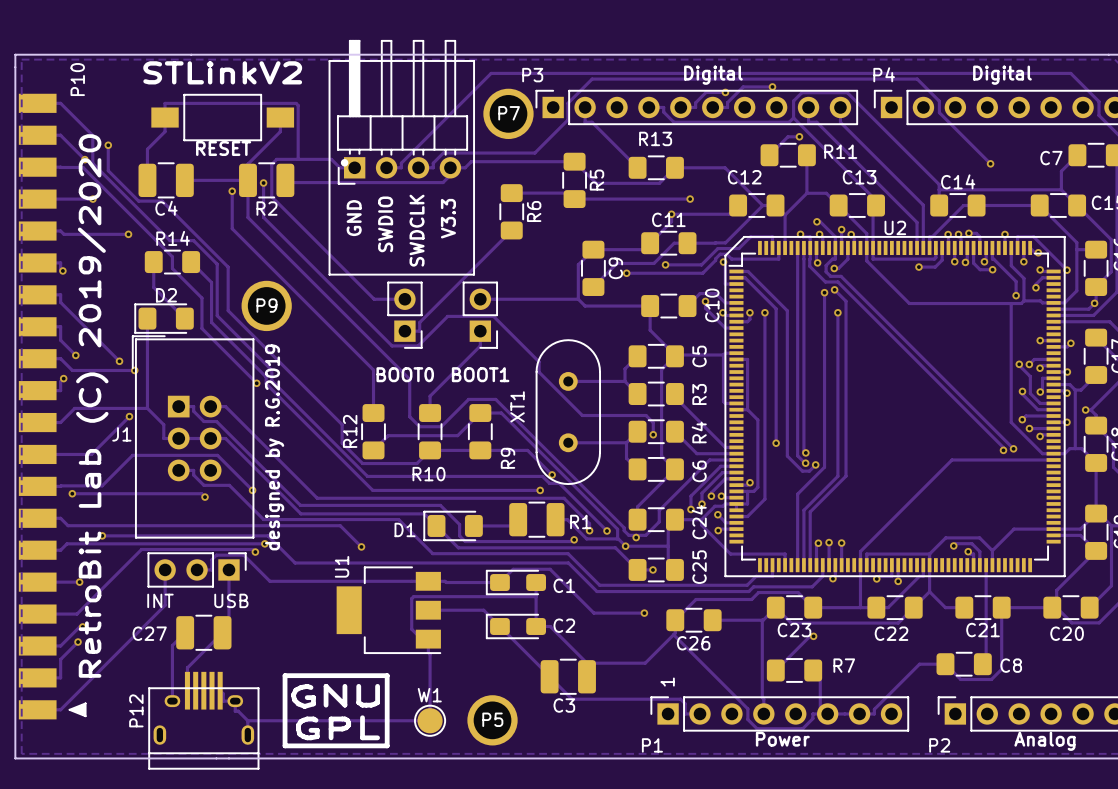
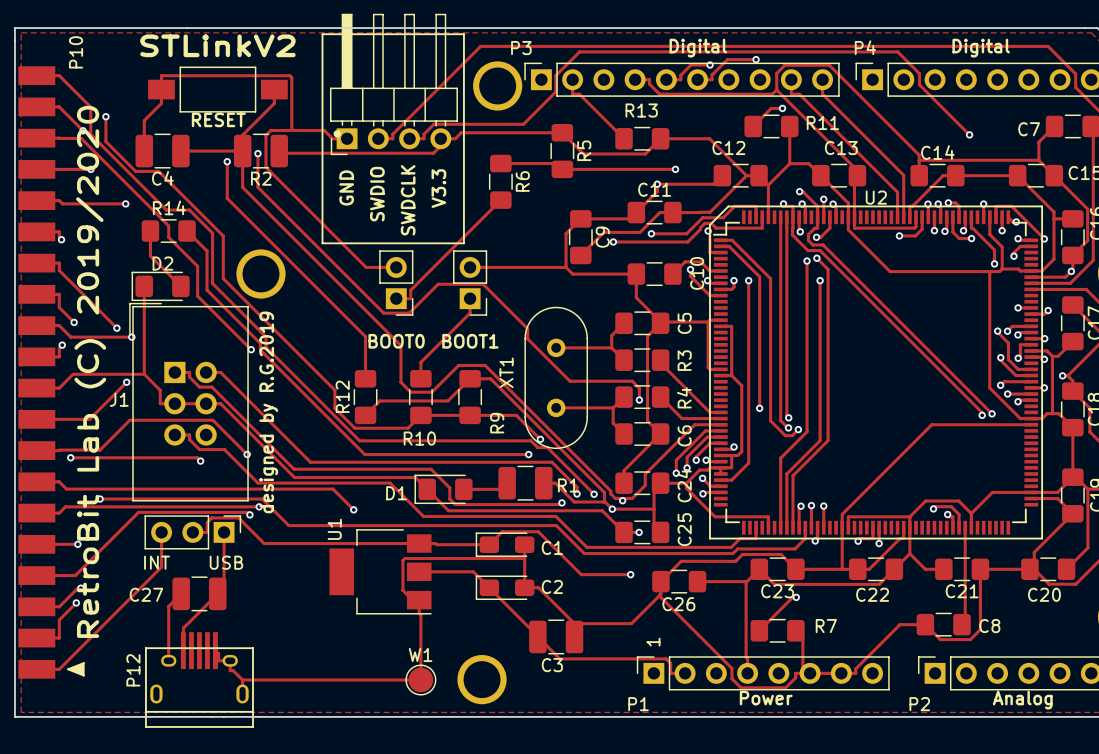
P7 name: P7 (509, 113) -> none
P9 name: P9 (266, 305) -> none
drawing: [282, 673, 390, 749] -> none
P5 name: P5 (492, 719) -> none

